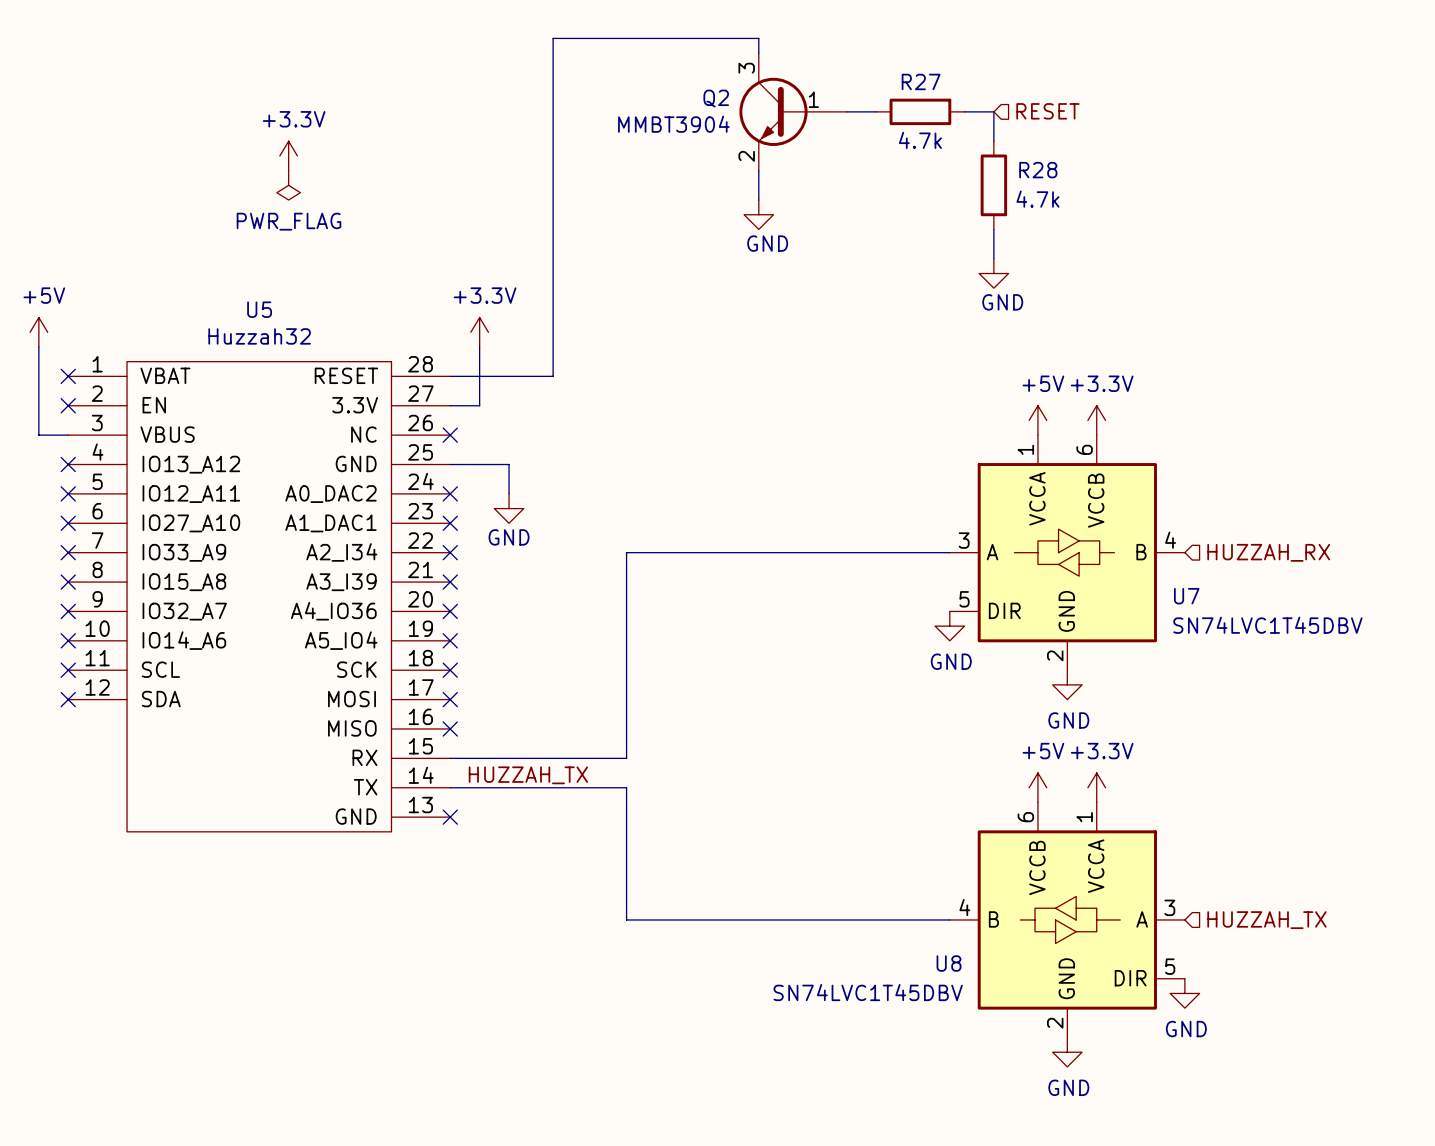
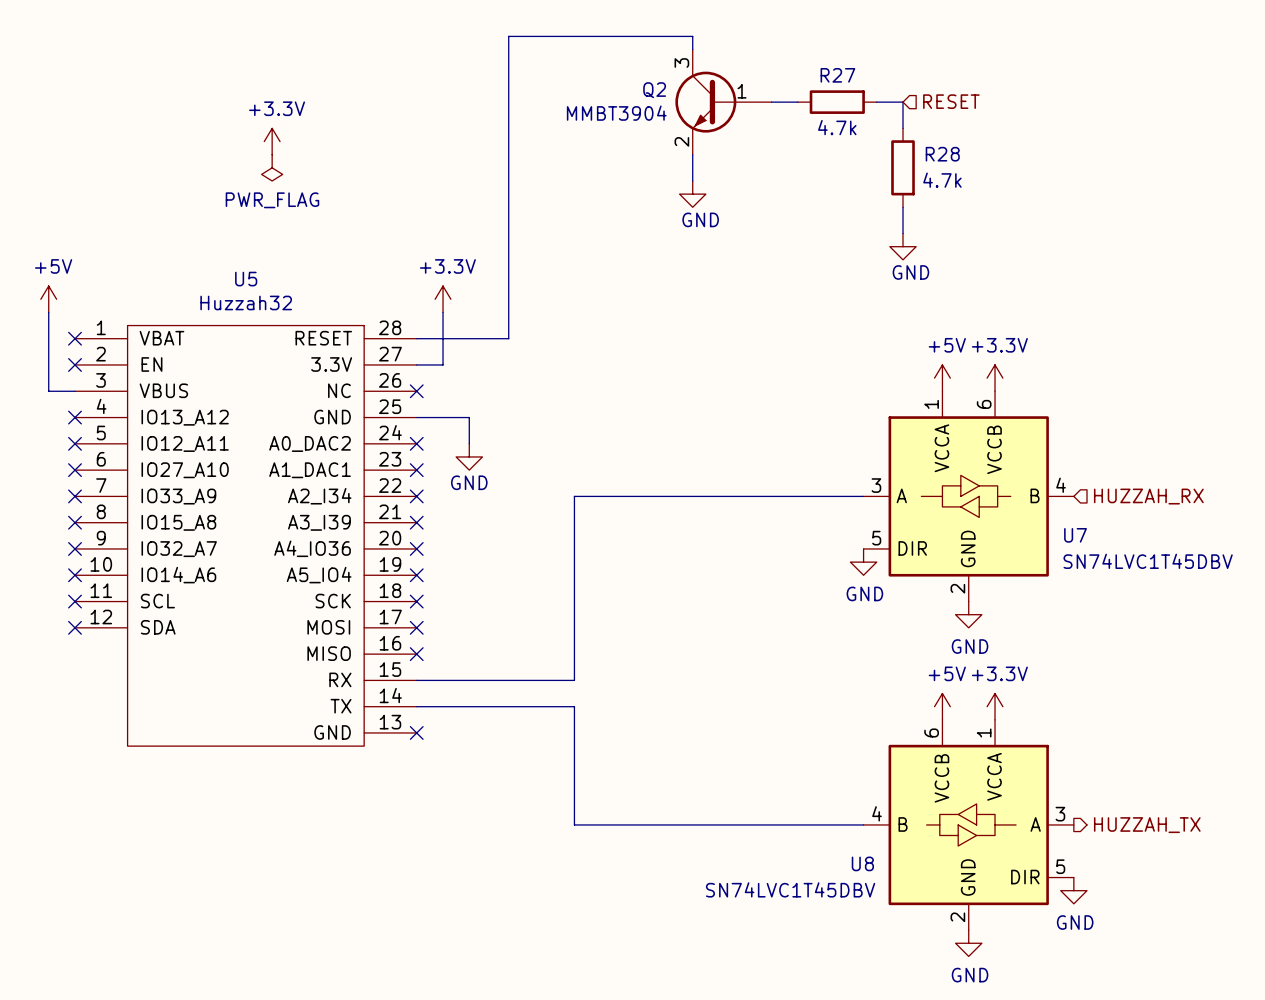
label: HUZZAH_TX (528, 775) -> none
hierarchical label shape: input (1266, 920) -> output (1147, 825)

